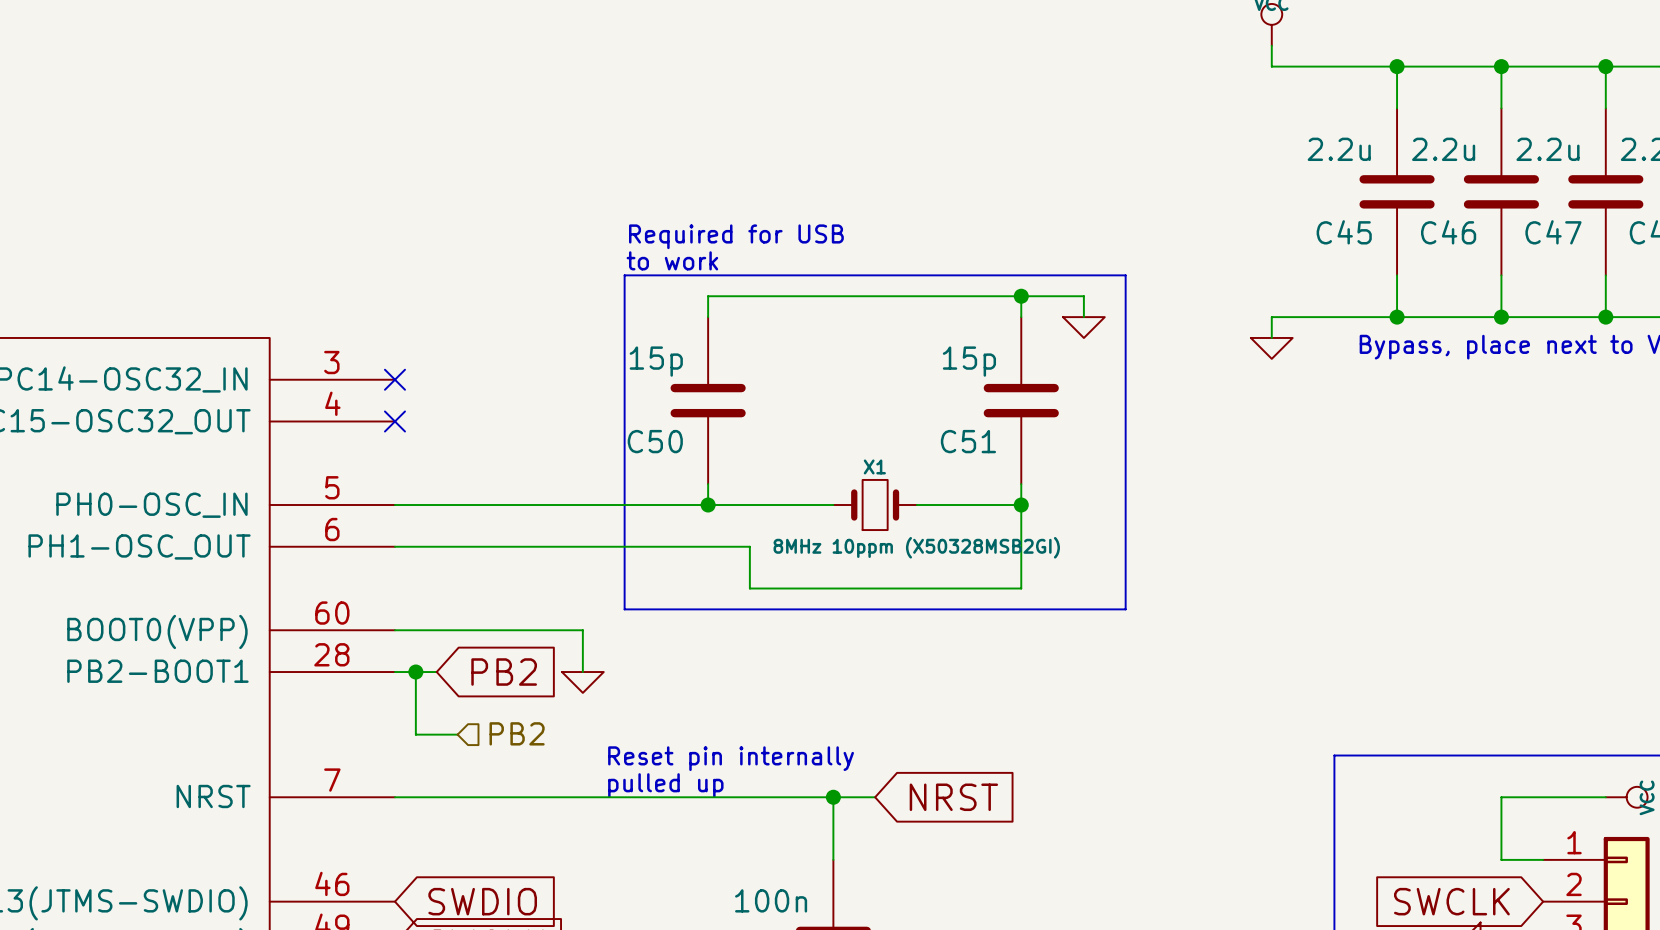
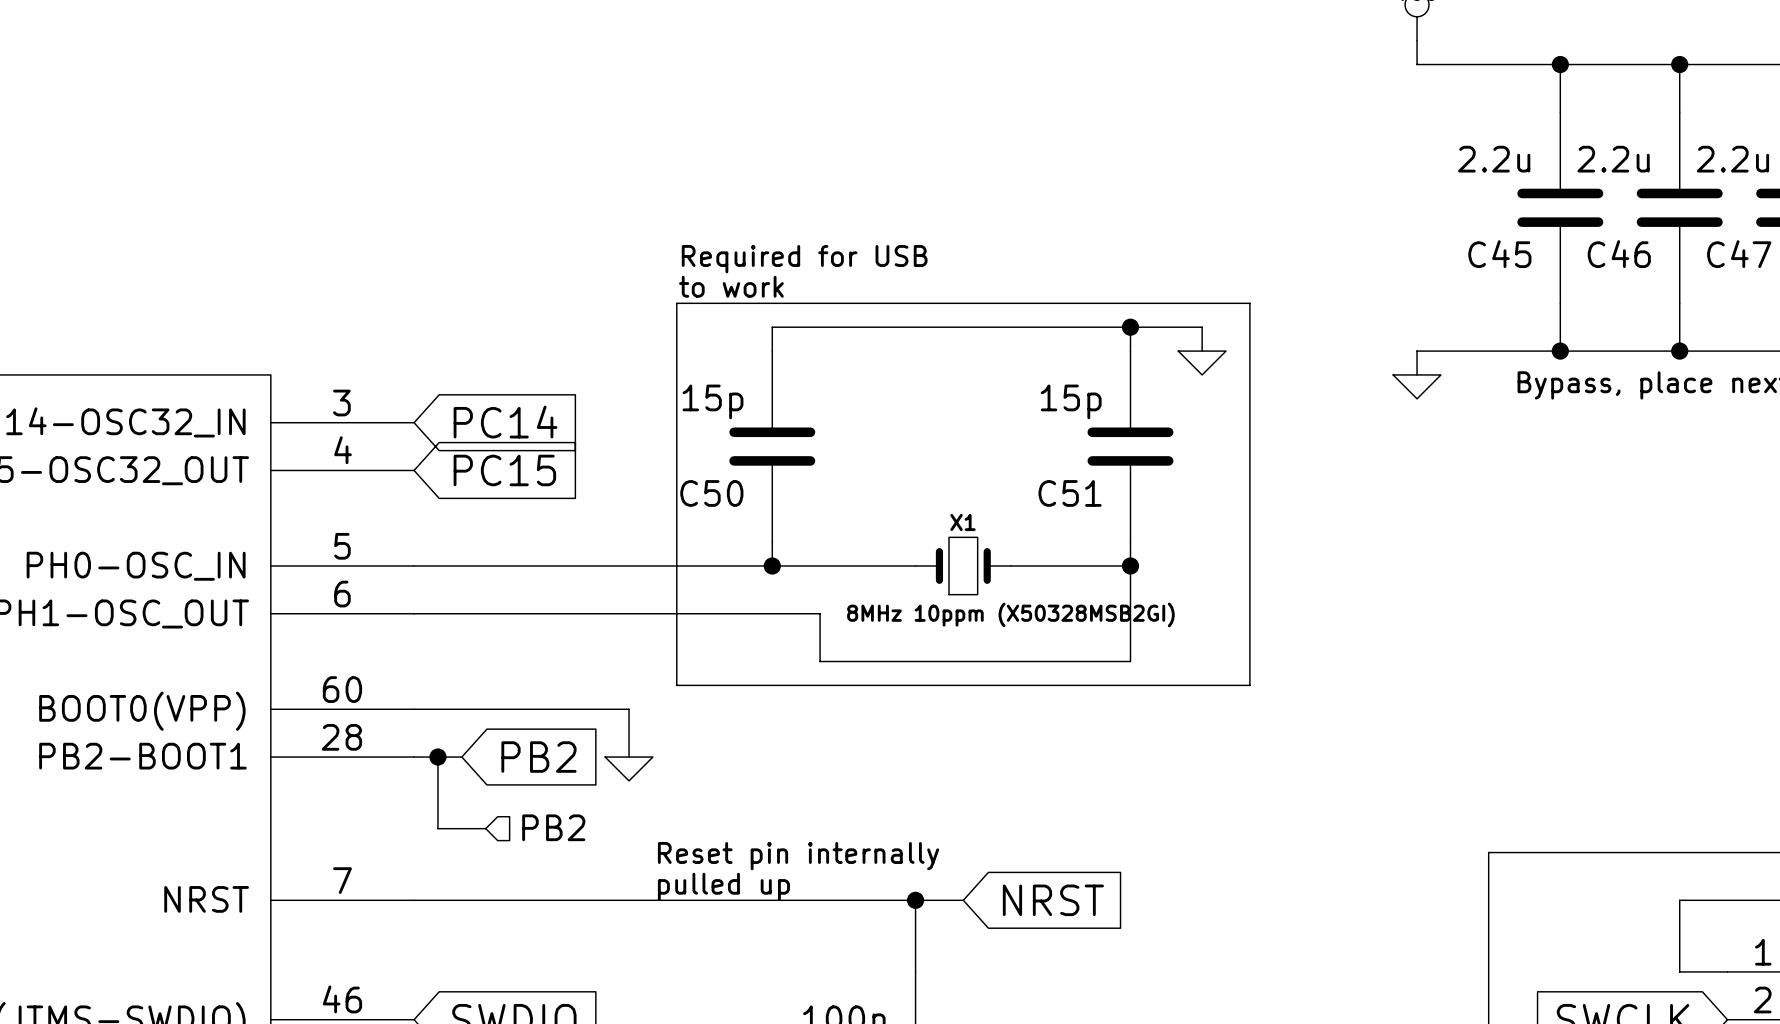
no-connect mark: (394, 379) -> none
global label: none -> PC14 (505, 422)
no-connect mark: (394, 421) -> none
global label: none -> PC15 (504, 470)

